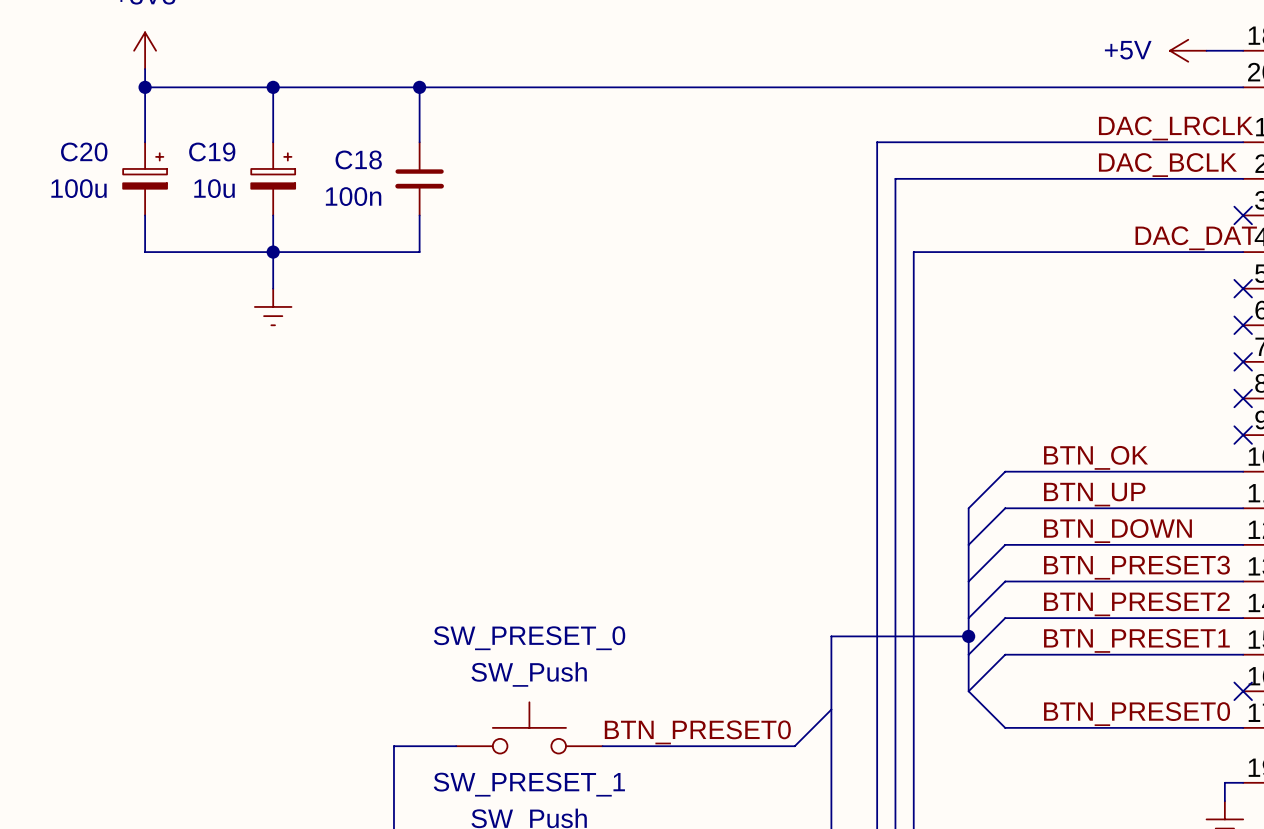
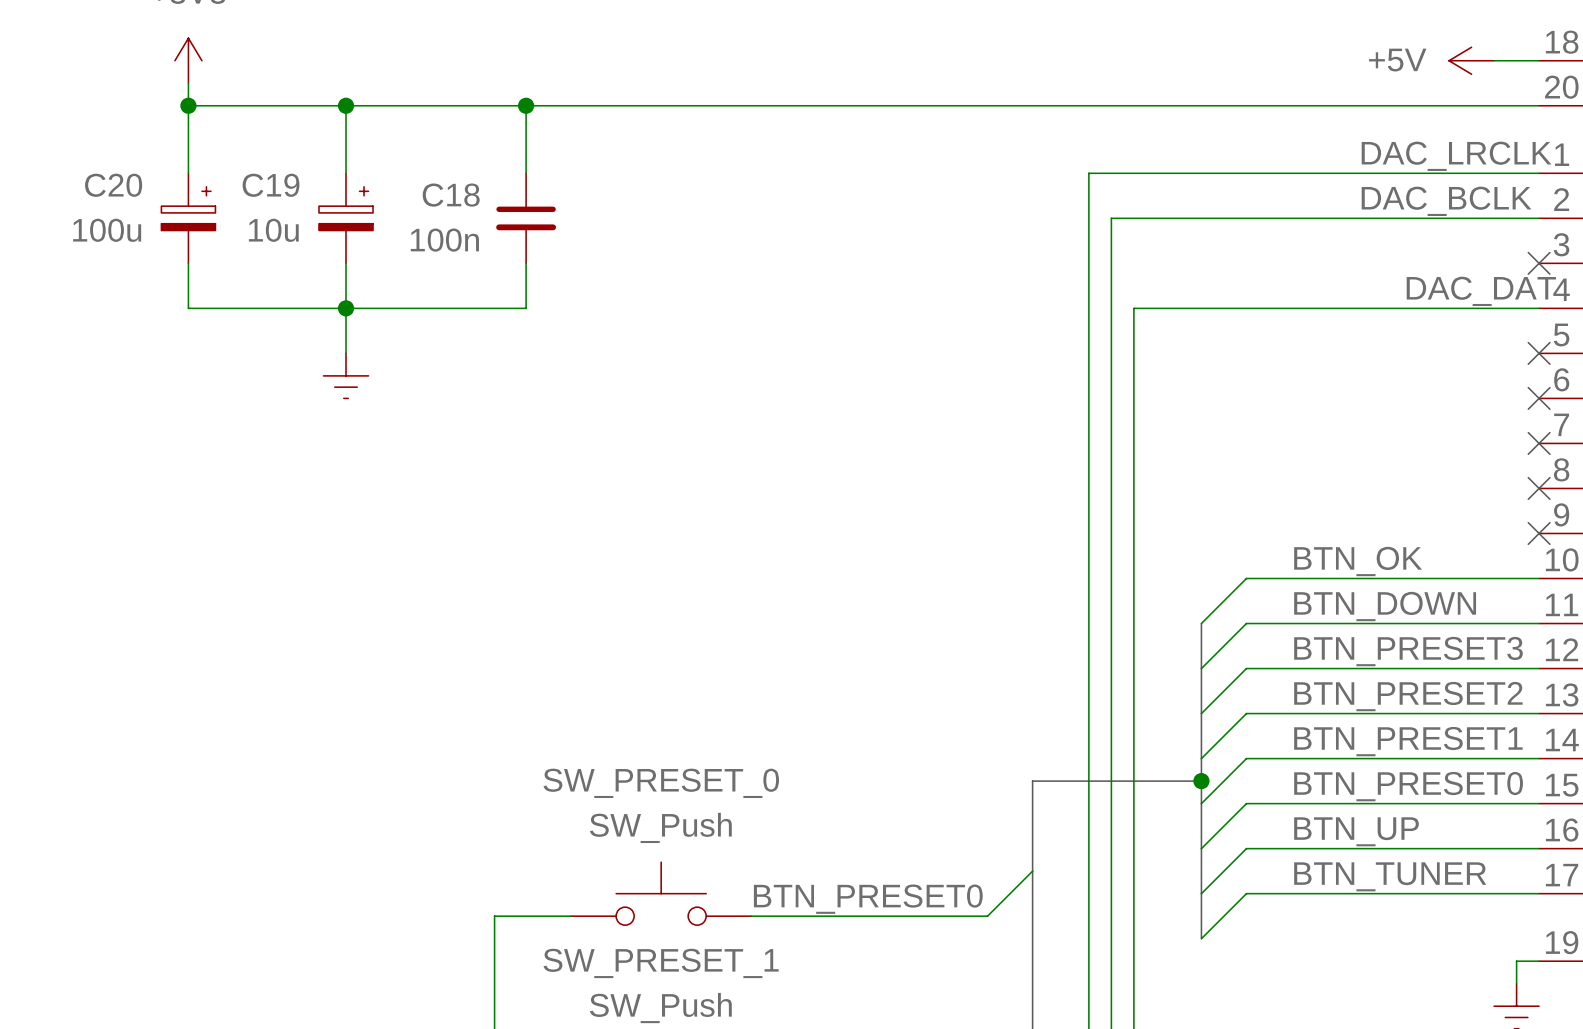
label: BTN_UP (1094, 494) -> BTN_DOWN (1385, 606)
label: BTN_DOWN (1117, 531) -> BTN_PRESET3 (1408, 651)
label: BTN_PRESET3 (1136, 567) -> BTN_PRESET2 (1408, 696)
label: BTN_PRESET2 (1136, 604) -> BTN_PRESET1 (1408, 741)
label: BTN_PRESET1 (1136, 640) -> BTN_PRESET0 (1408, 786)
label: none -> BTN_UP (1356, 831)
wire: (968, 691) (1005, 727) -> (1201, 938) (1246, 893)
bus: none -> (1201, 848) (1201, 938)
wire: none -> (1539, 848) (1246, 848) (1201, 893)
no-connect mark: (1243, 691) -> none
label: BTN_PRESET0 (1137, 714) -> BTN_TUNER (1390, 876)

